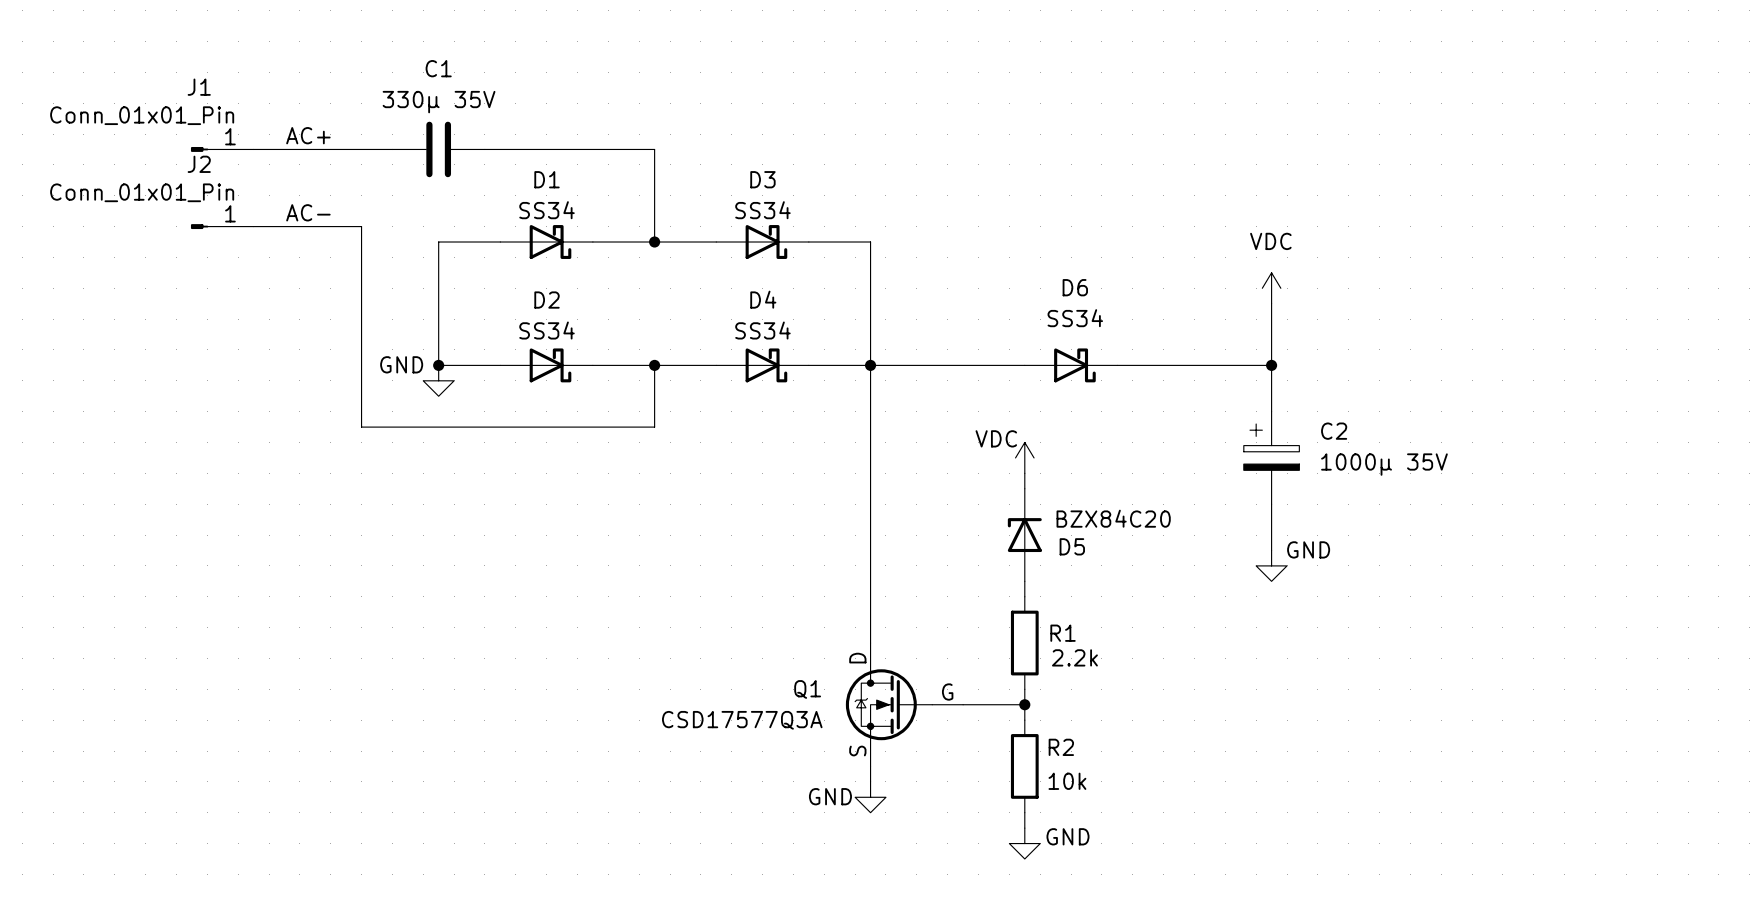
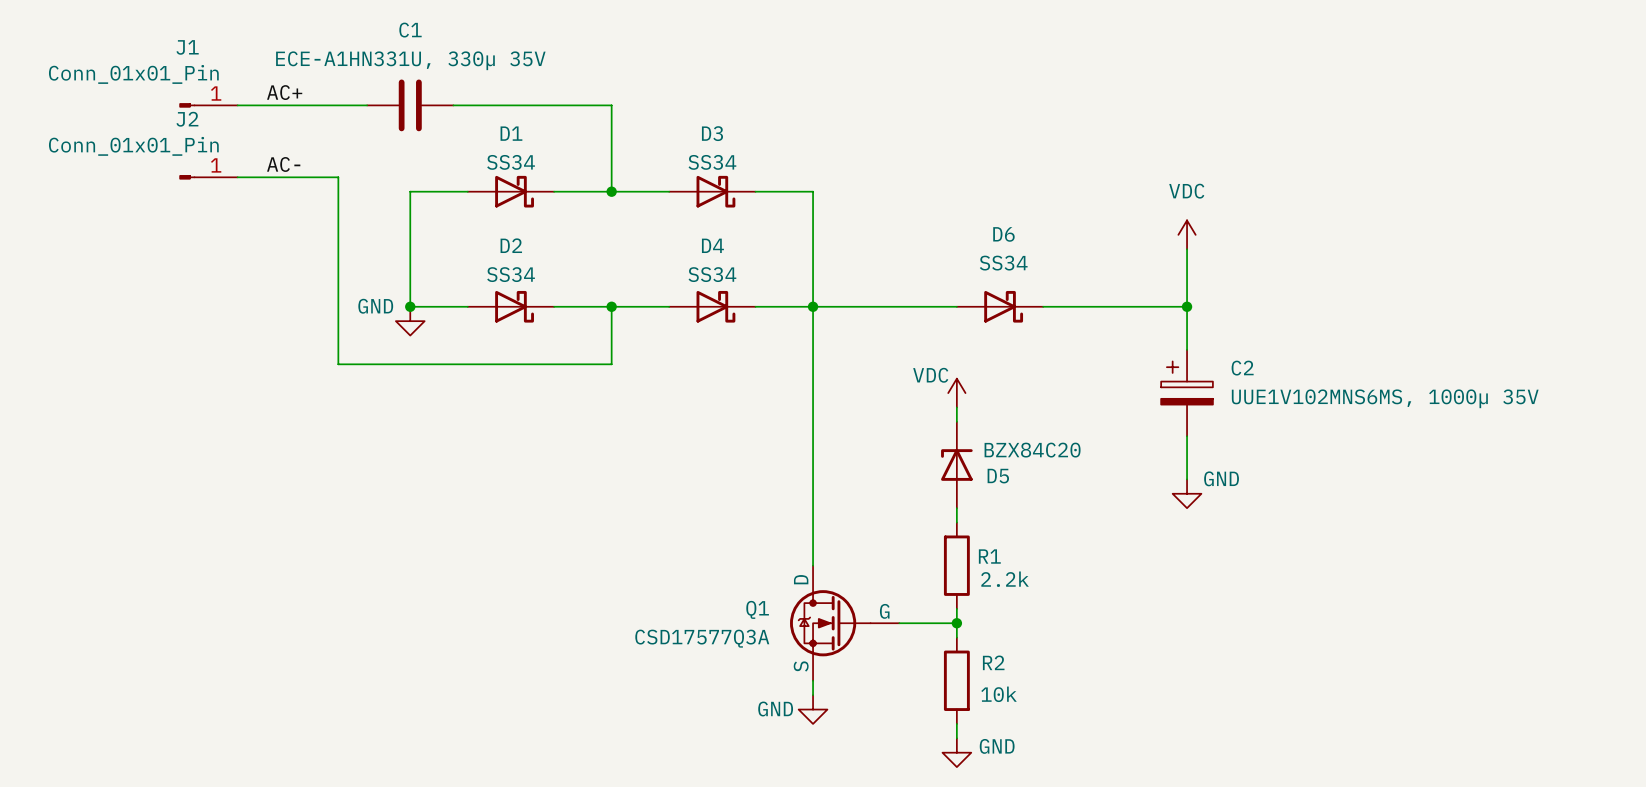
C1 value: 330µ 35V (439, 102) -> ECE-A1HN331U, 330µ 35V (410, 60)
C2 value: 1000µ 35V (1384, 464) -> UUE1V102MNS6MS, 1000µ 35V (1385, 398)

